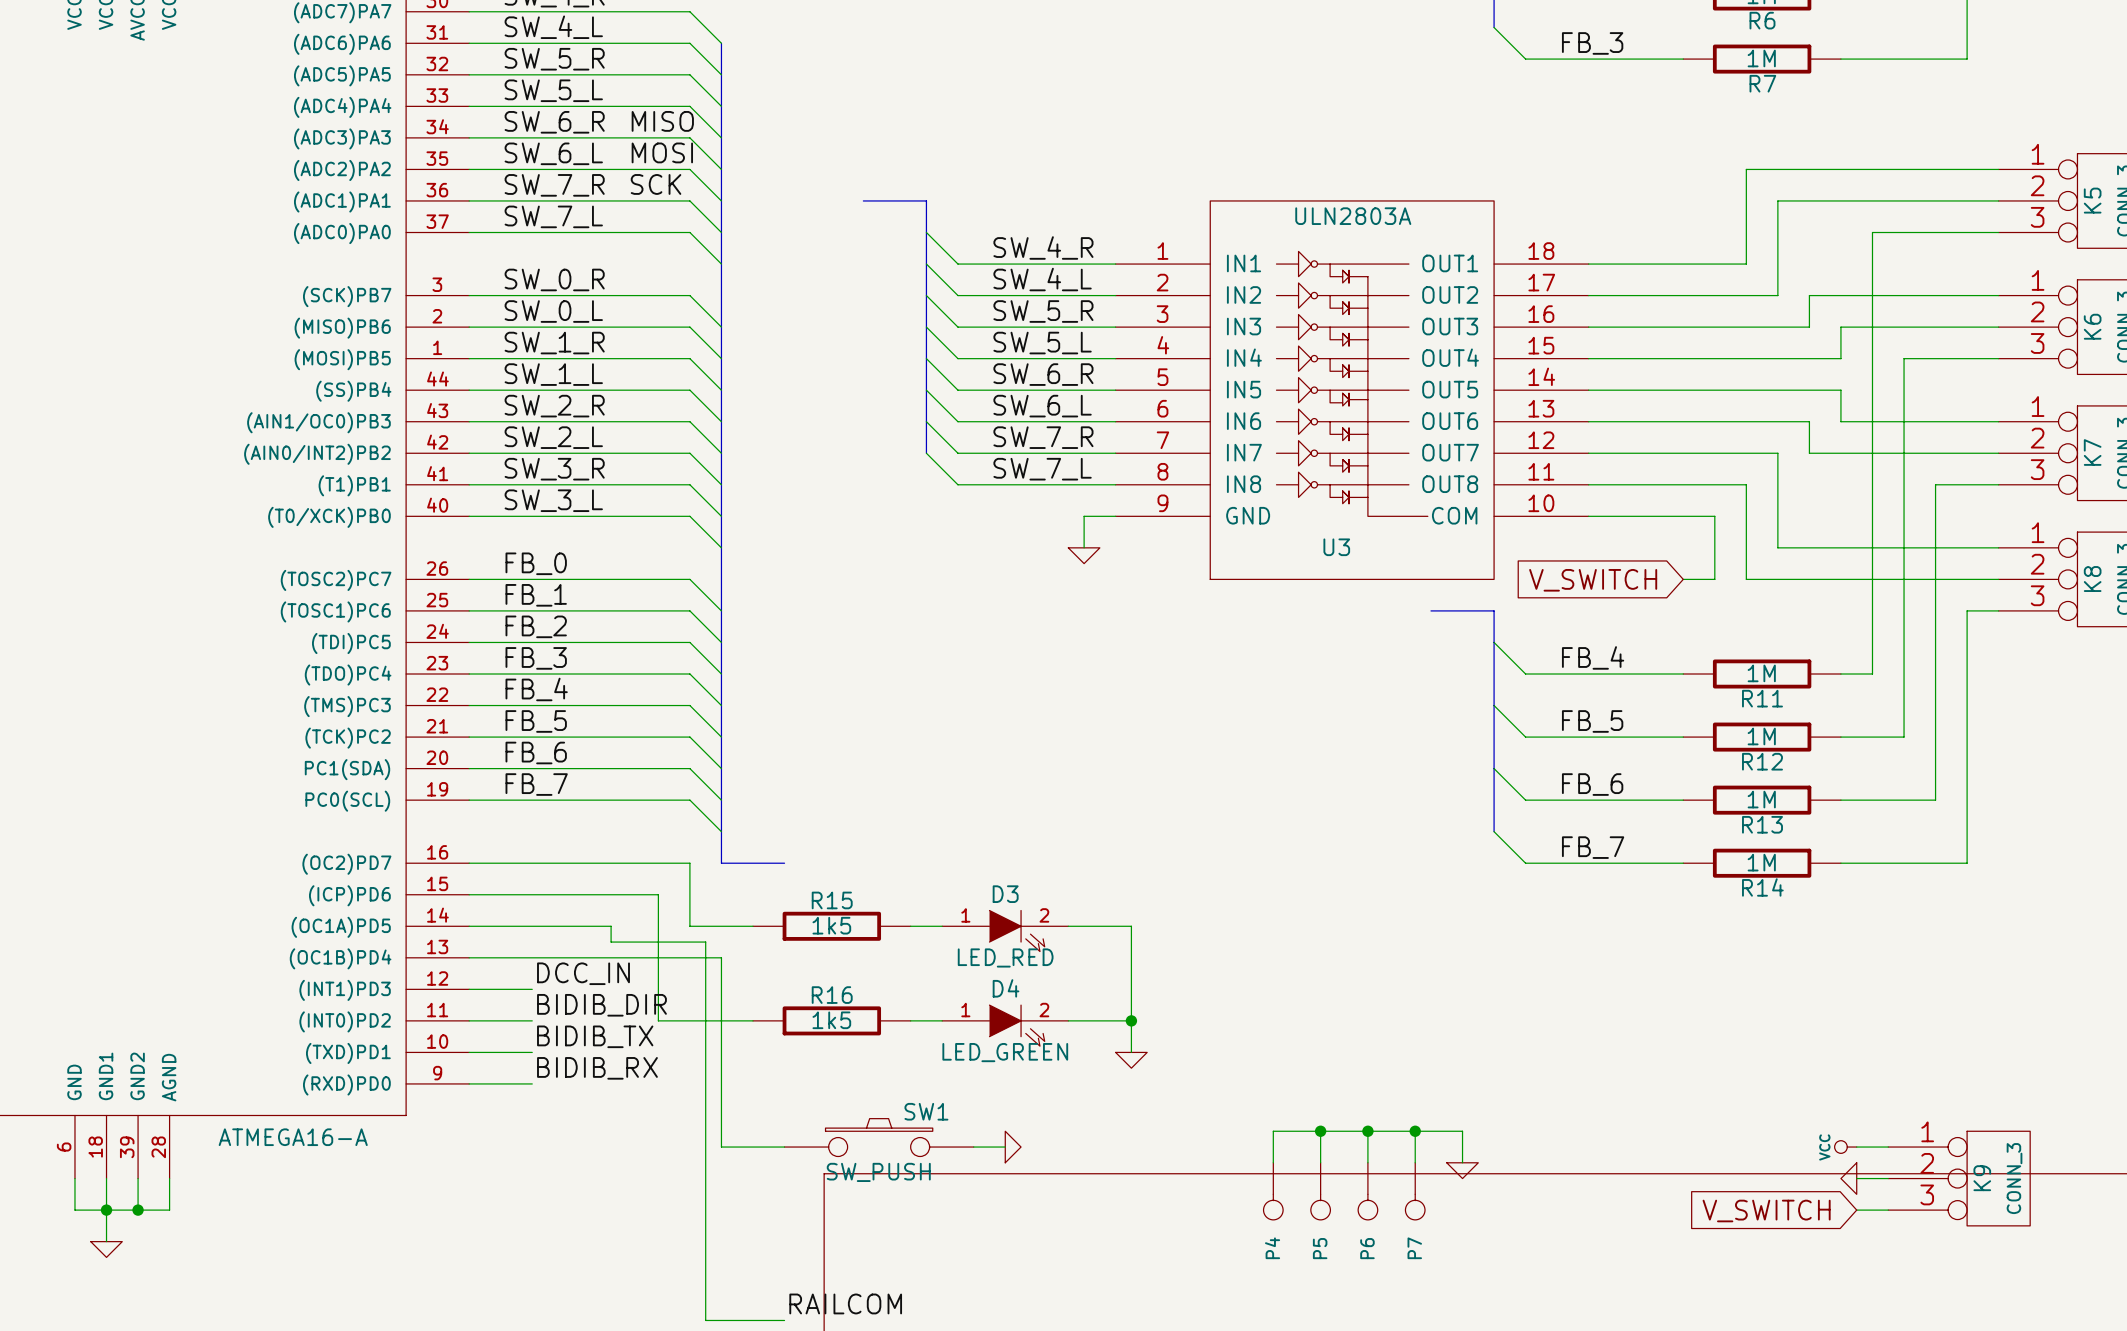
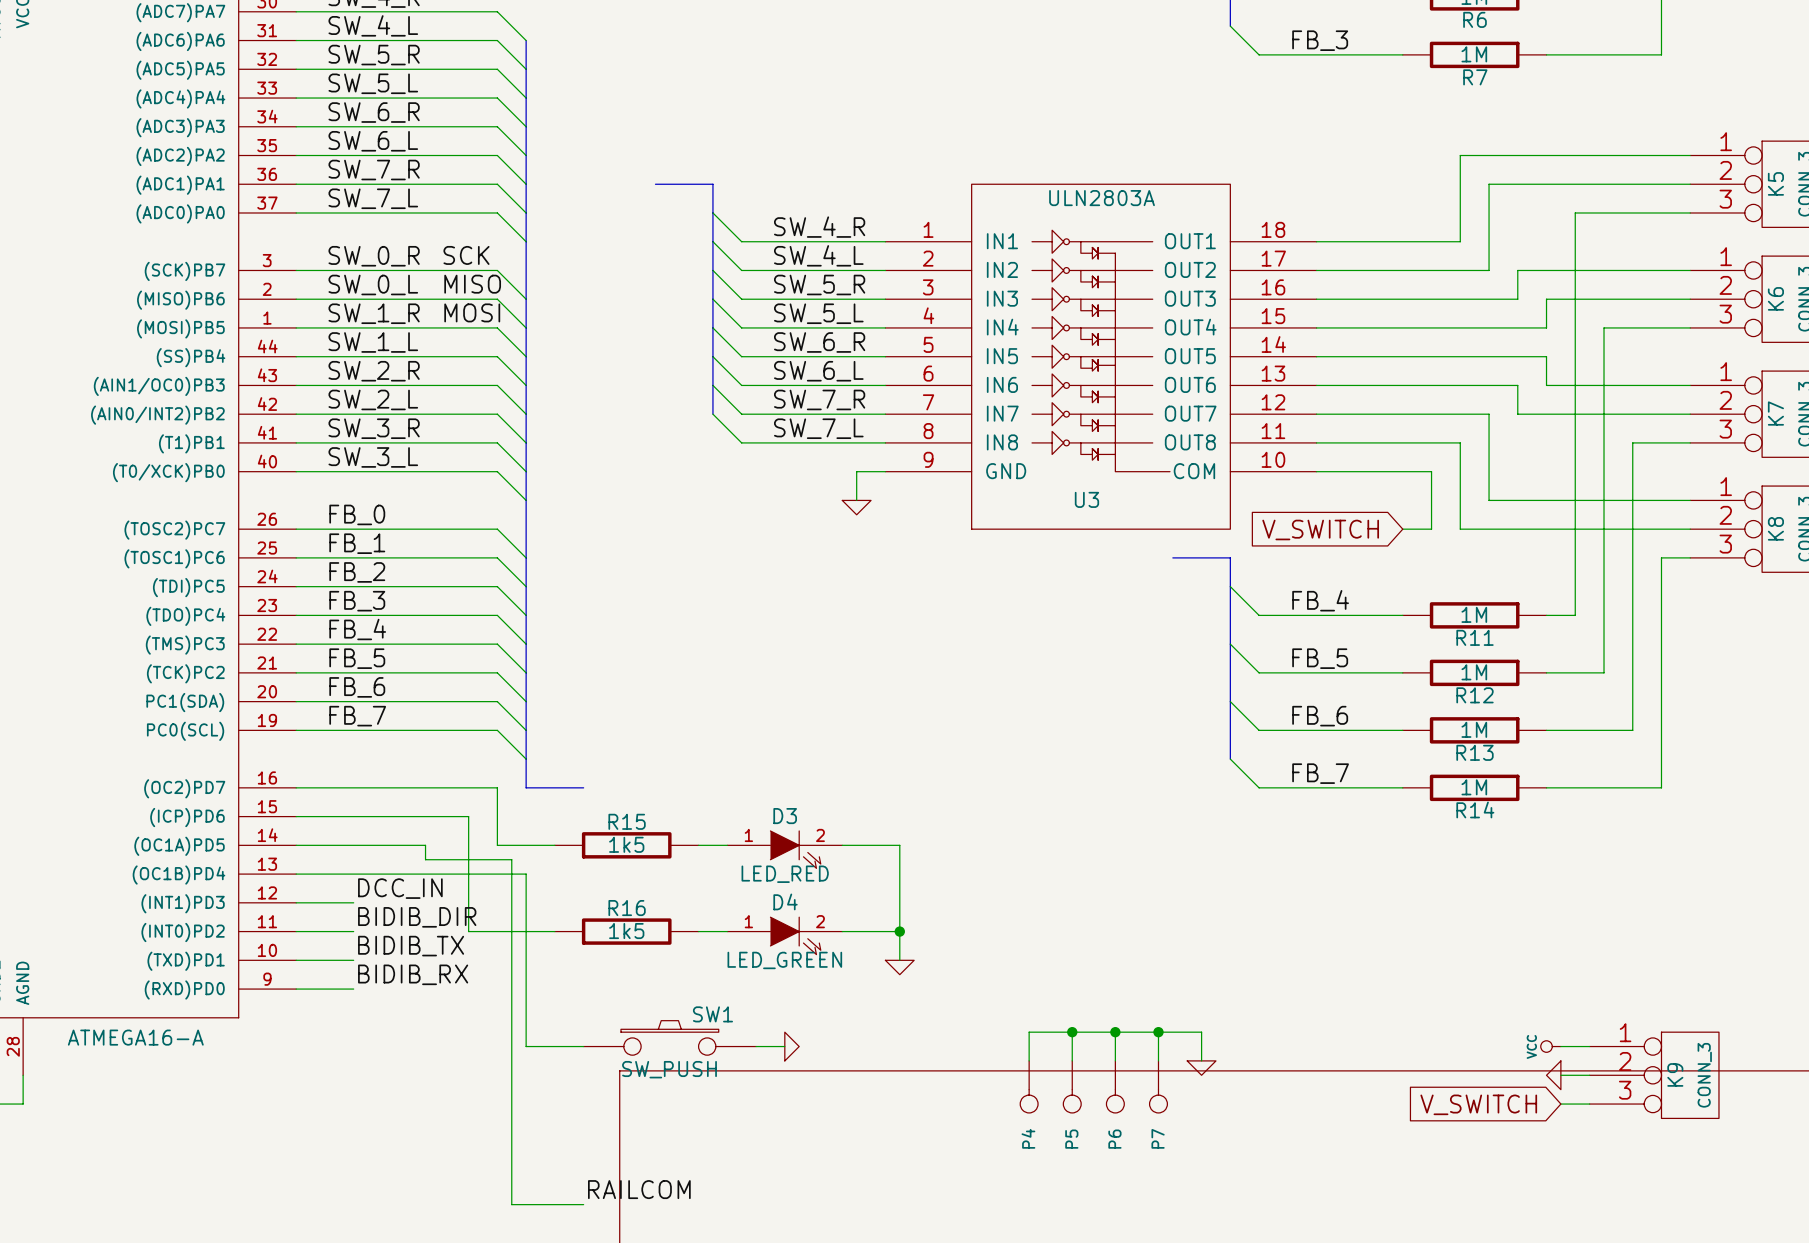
label position: MISO (662, 121) -> MISO (472, 284)
label position: MOSI (662, 152) -> MOSI (472, 312)
label position: SCK (656, 184) -> SCK (466, 255)

